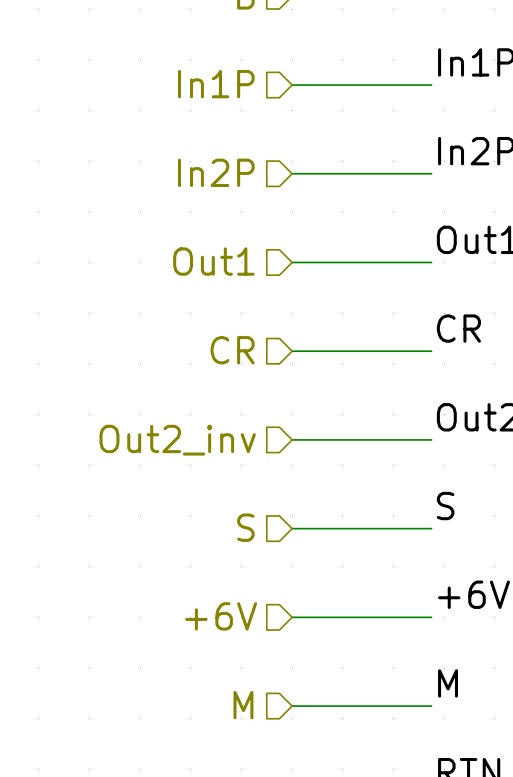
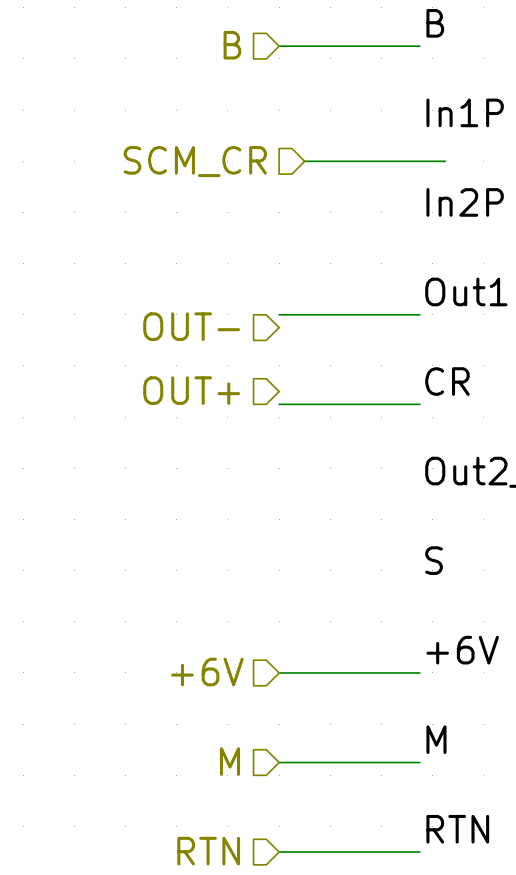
hierarchical label: In1P (216, 84) -> none
wire: (292, 85) (431, 85) -> (304, 161) (445, 161)
hierarchical label: none -> SCM_CR (195, 161)
hierarchical label: In2P (216, 172) -> none
wire: (292, 173) (431, 173) -> none
hierarchical label: Out1 (213, 261) -> OUT- (191, 326)
hierarchical label: CR (232, 350) -> OUT+ (191, 390)
wire: (292, 439) (431, 439) -> none
hierarchical label: Out2_inv (177, 440) -> none
hierarchical label: S (245, 527) -> none
wire: (292, 528) (431, 528) -> none

